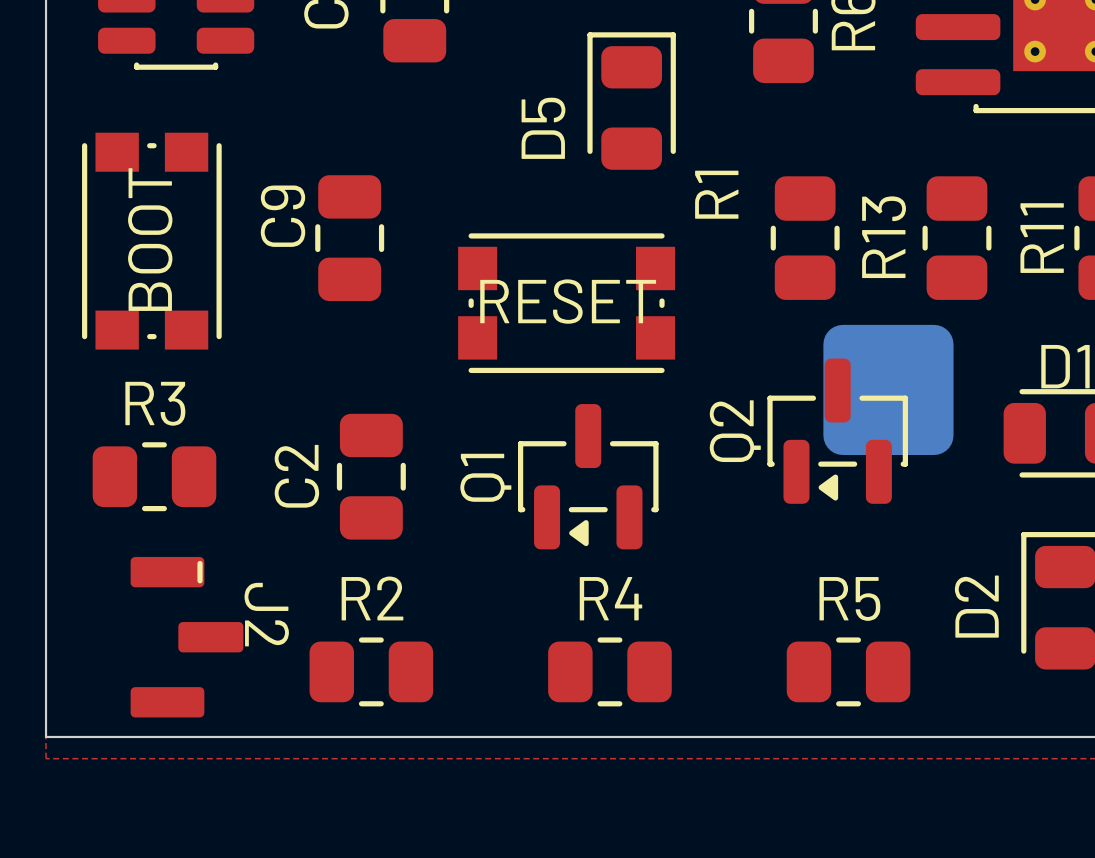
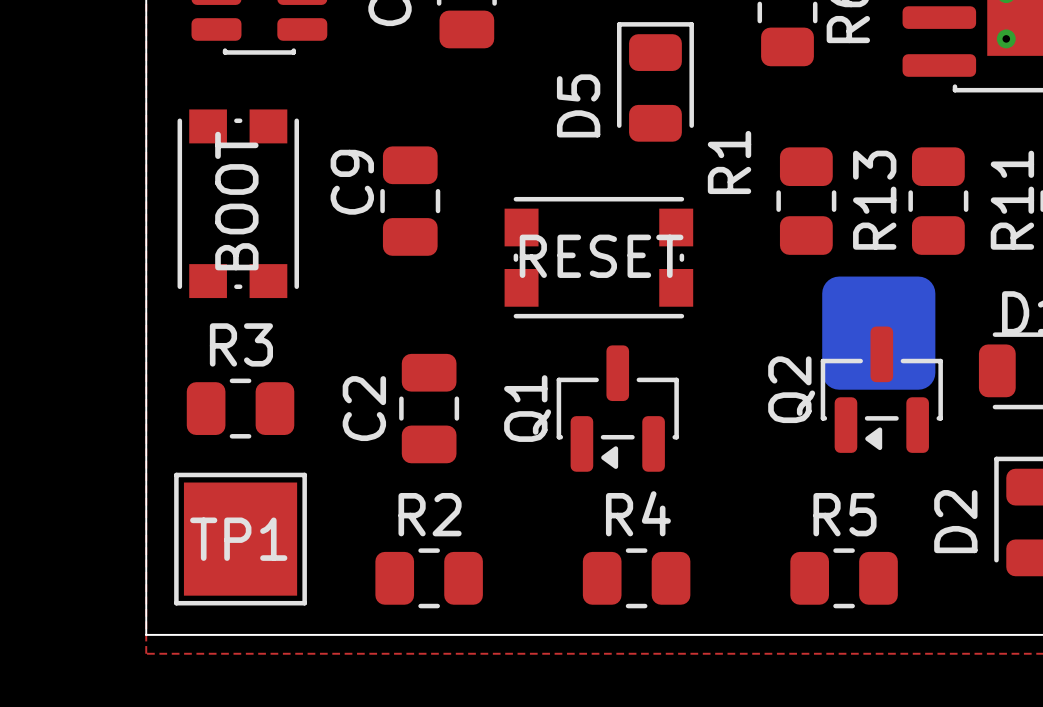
Q2 position: (837, 431) -> (881, 389)
TP1: none -> (240, 539)
J2: (187, 637) -> none

